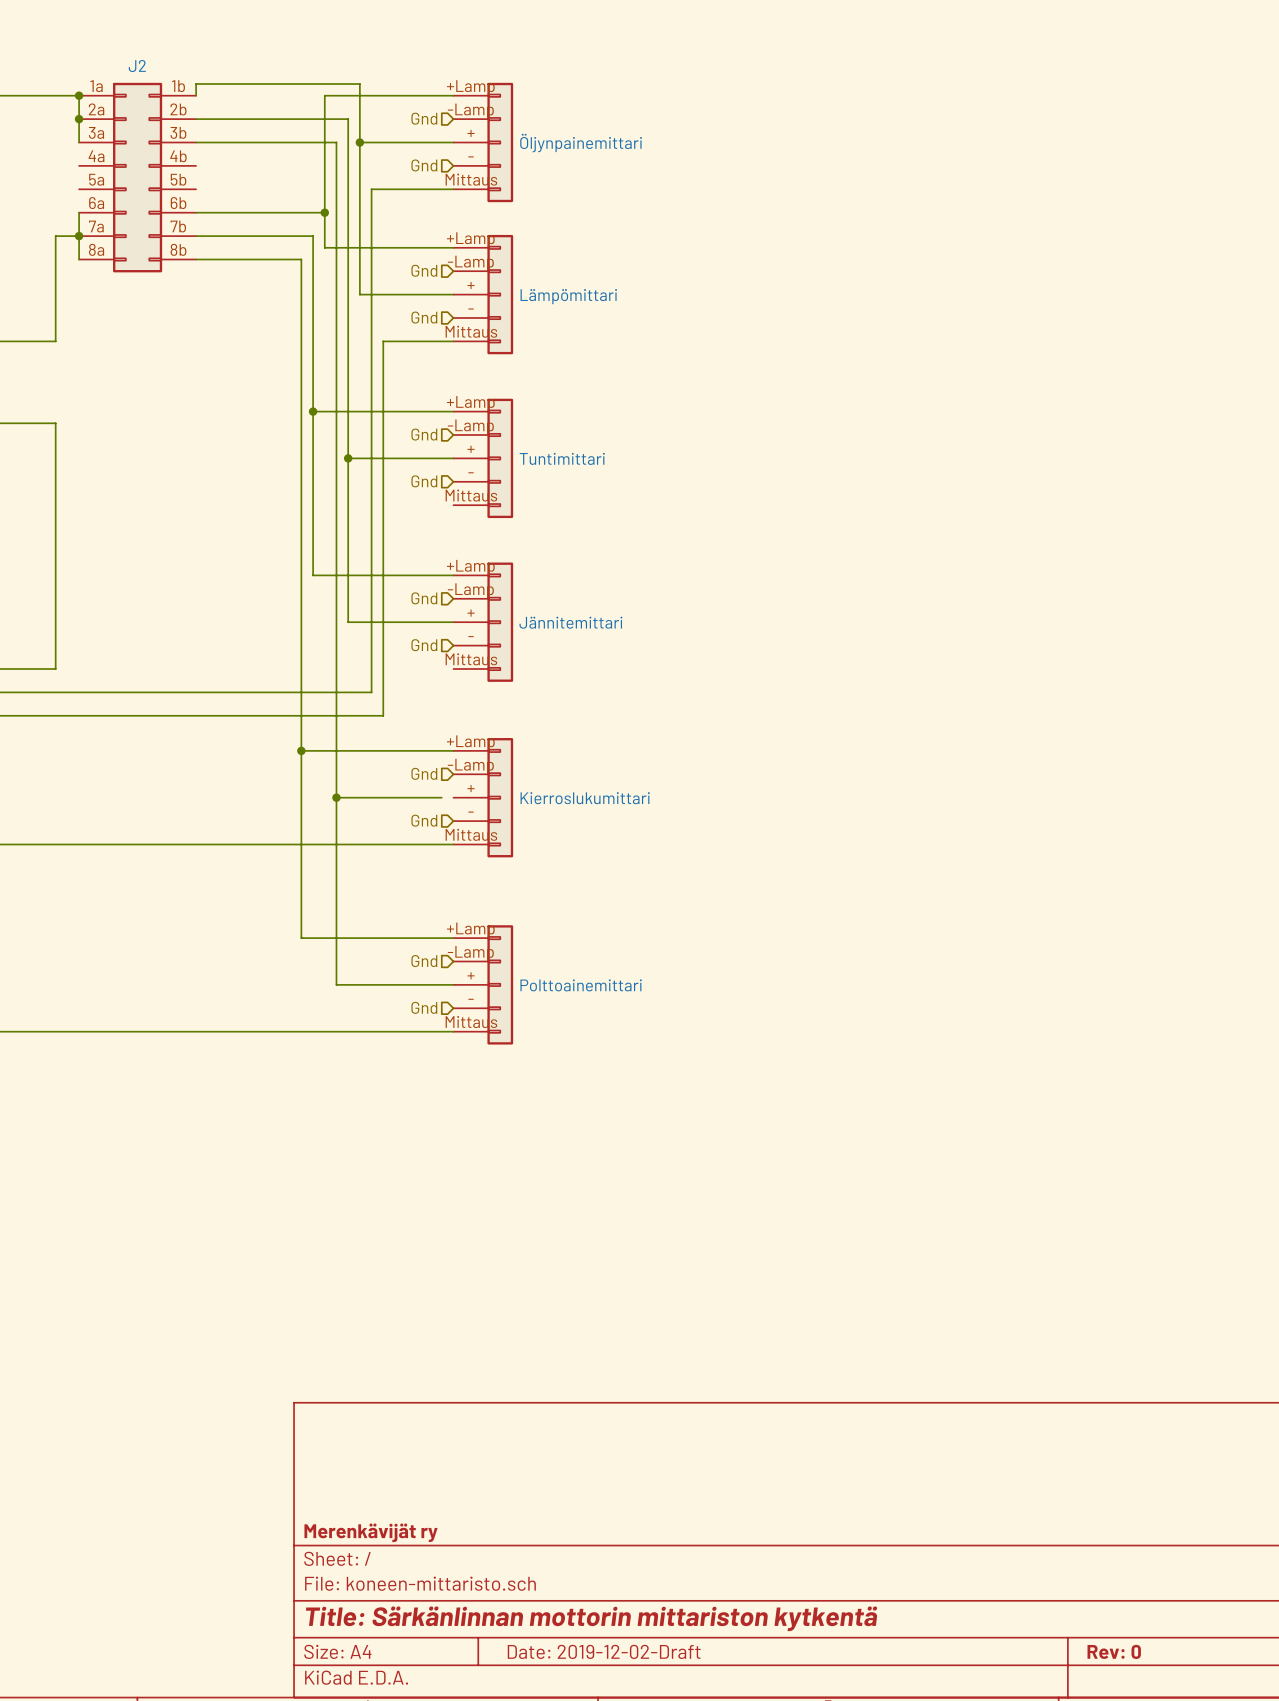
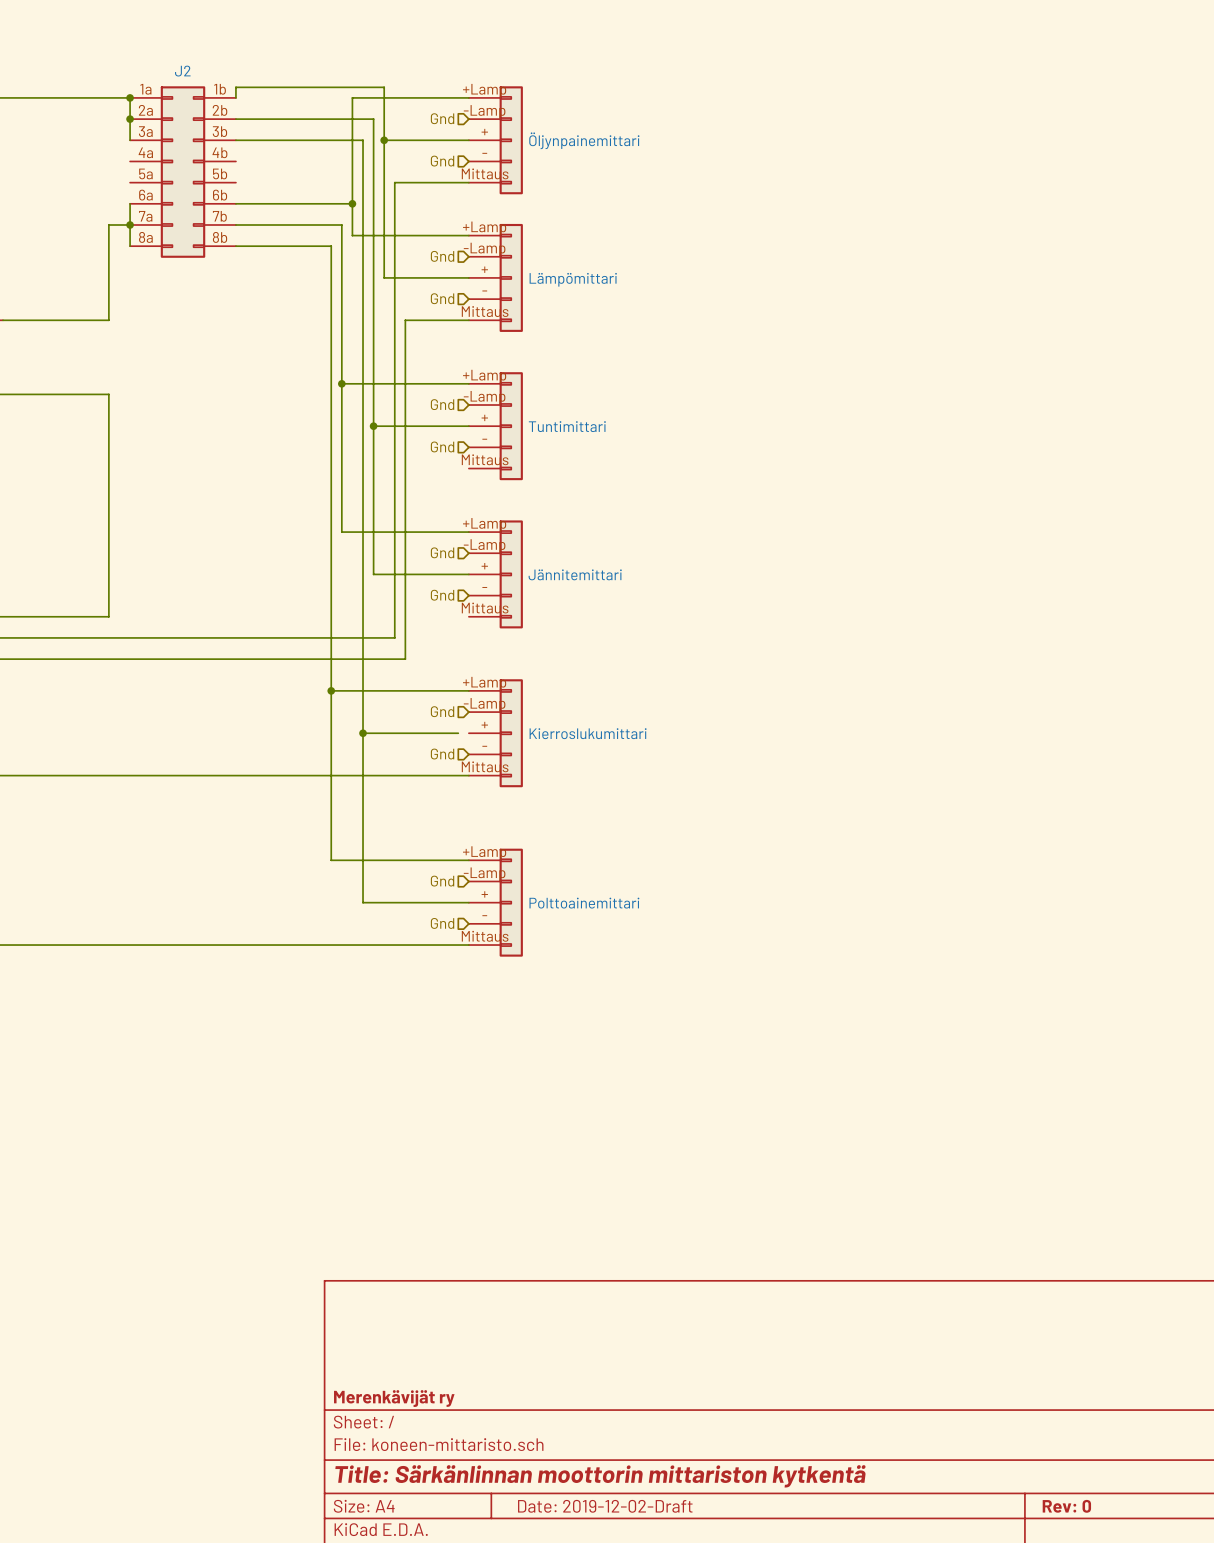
title block: Title: Särkänlinnan mottorin mittariston kytkentä (591, 1618) -> Title: Särkänlinnan moottorin mittariston kytkentä (600, 1476)

